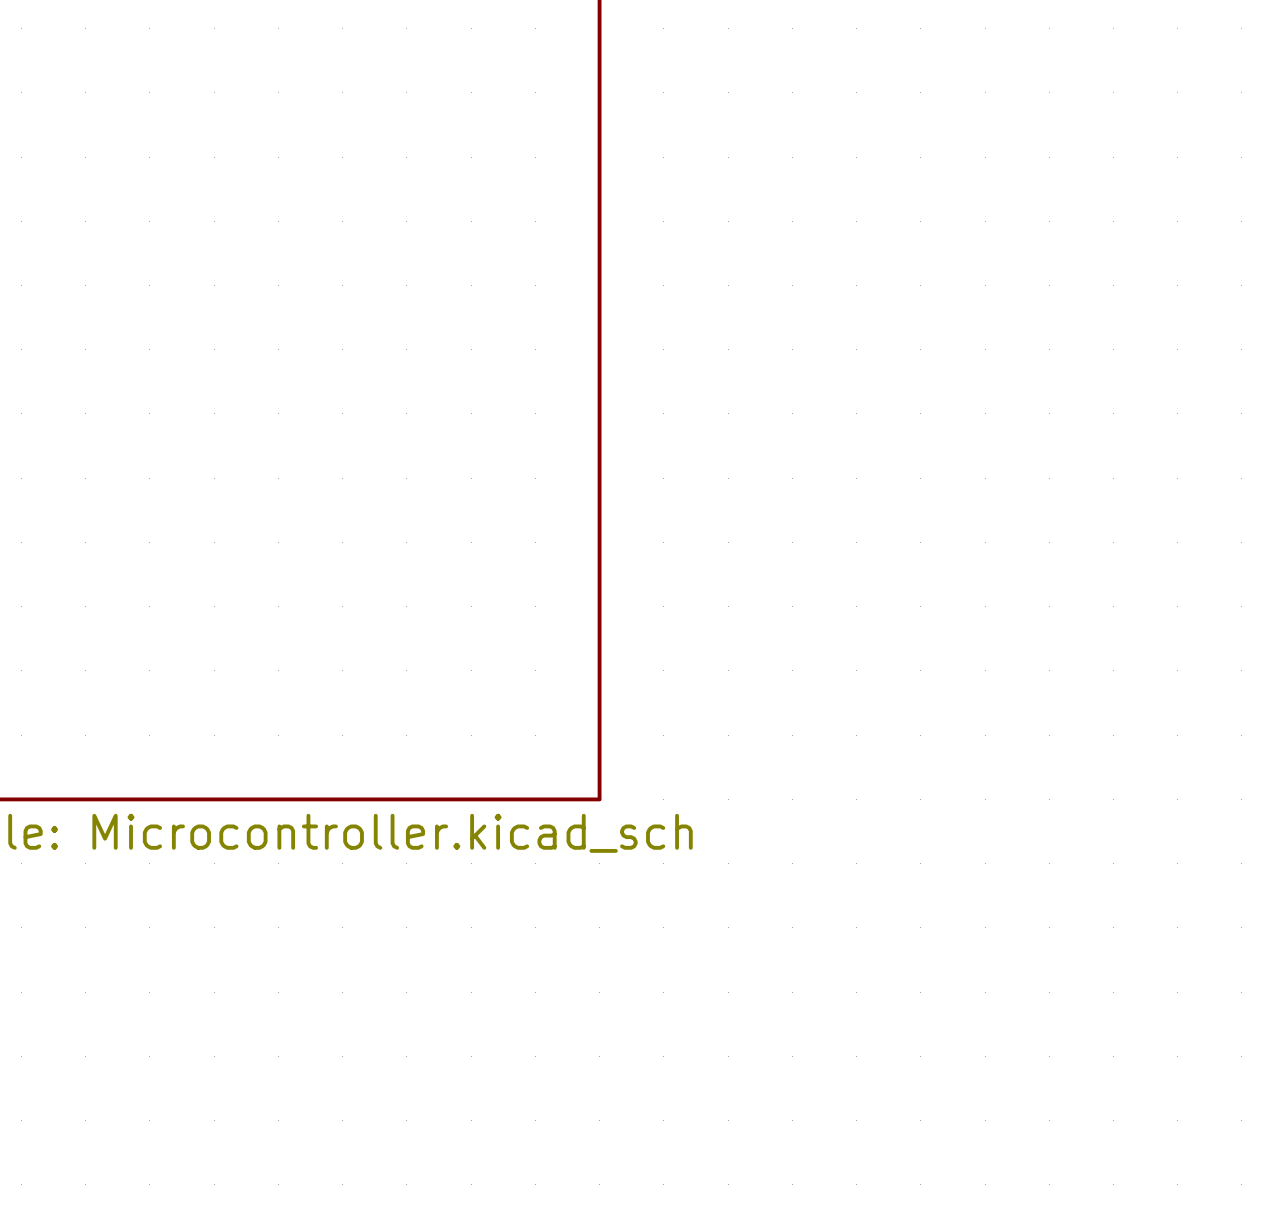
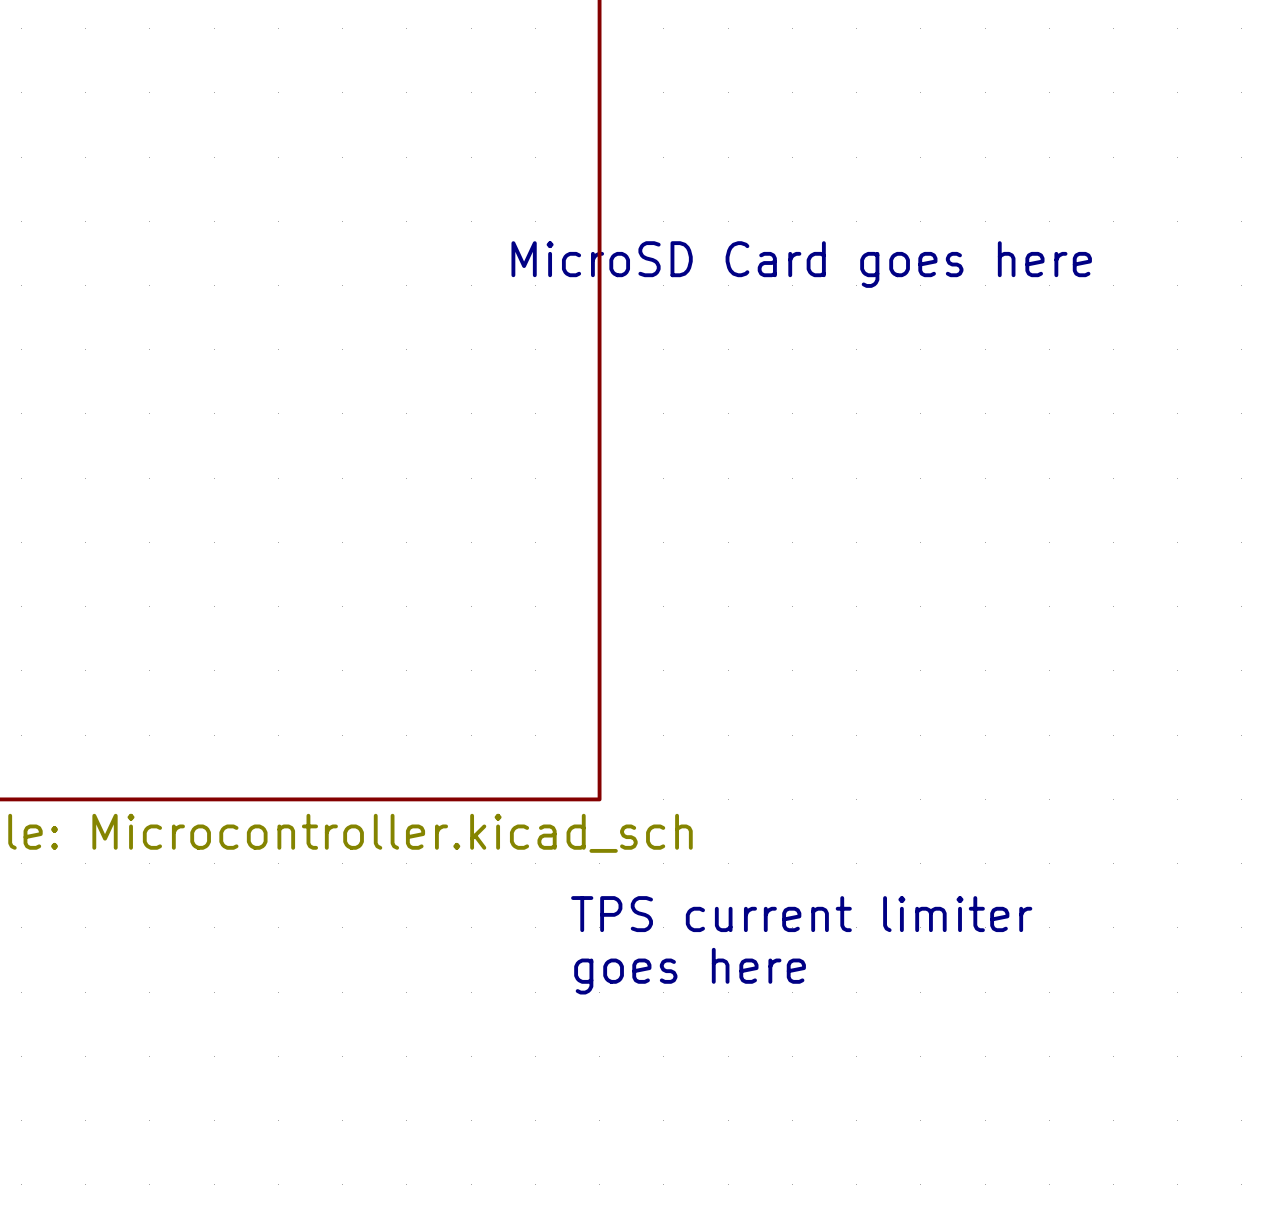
text: none -> MicroSD Card goes here (801, 264)
text: none -> TPS current limiter (801, 914)
text: none -> goes here (690, 971)

